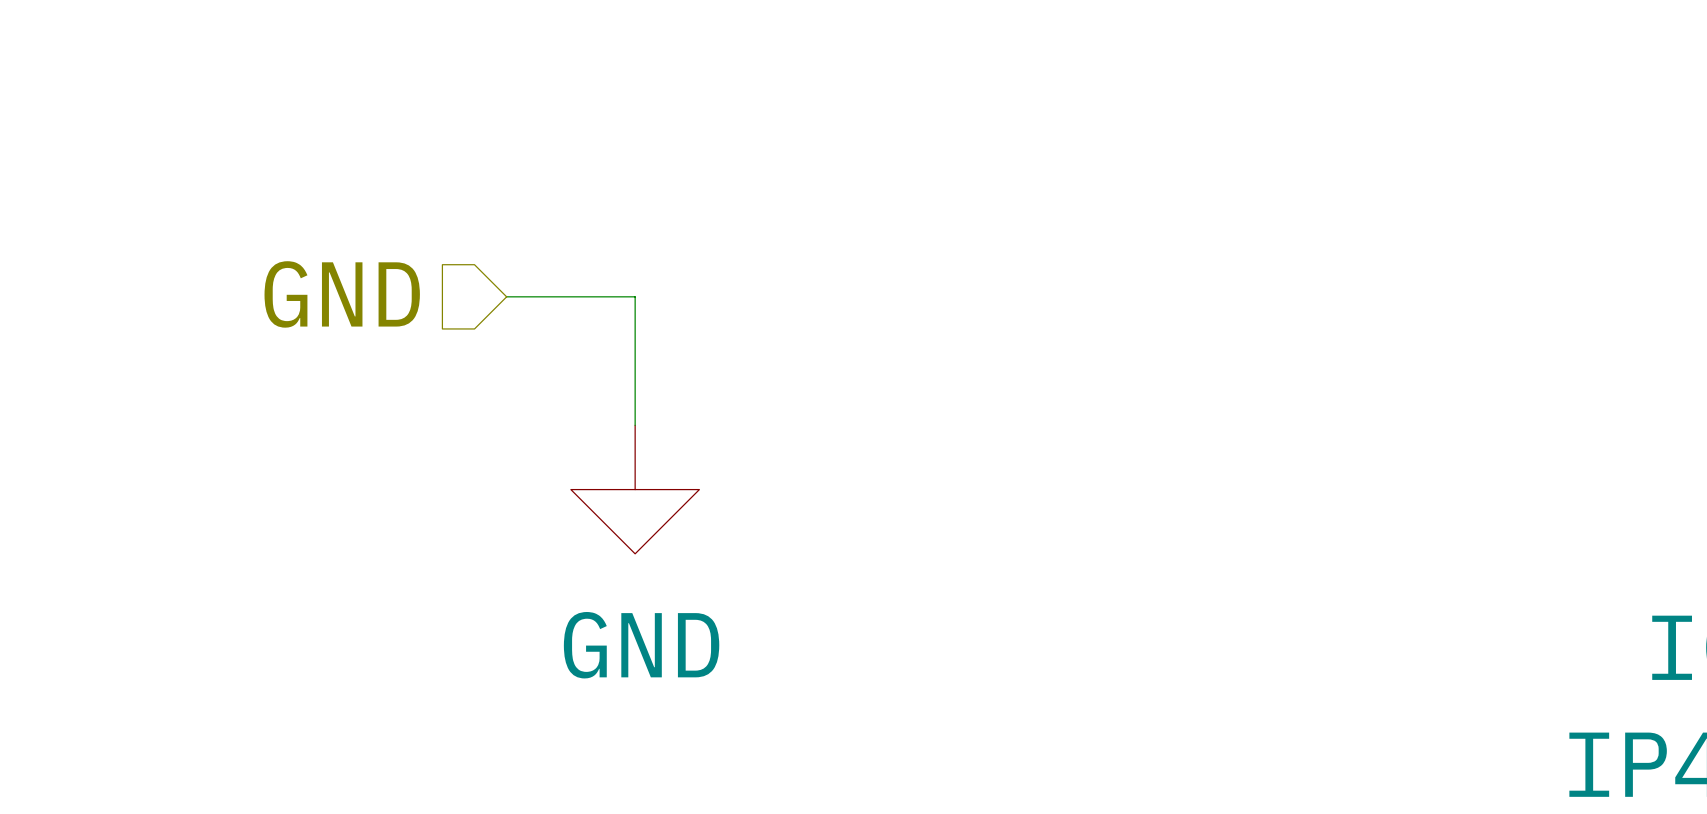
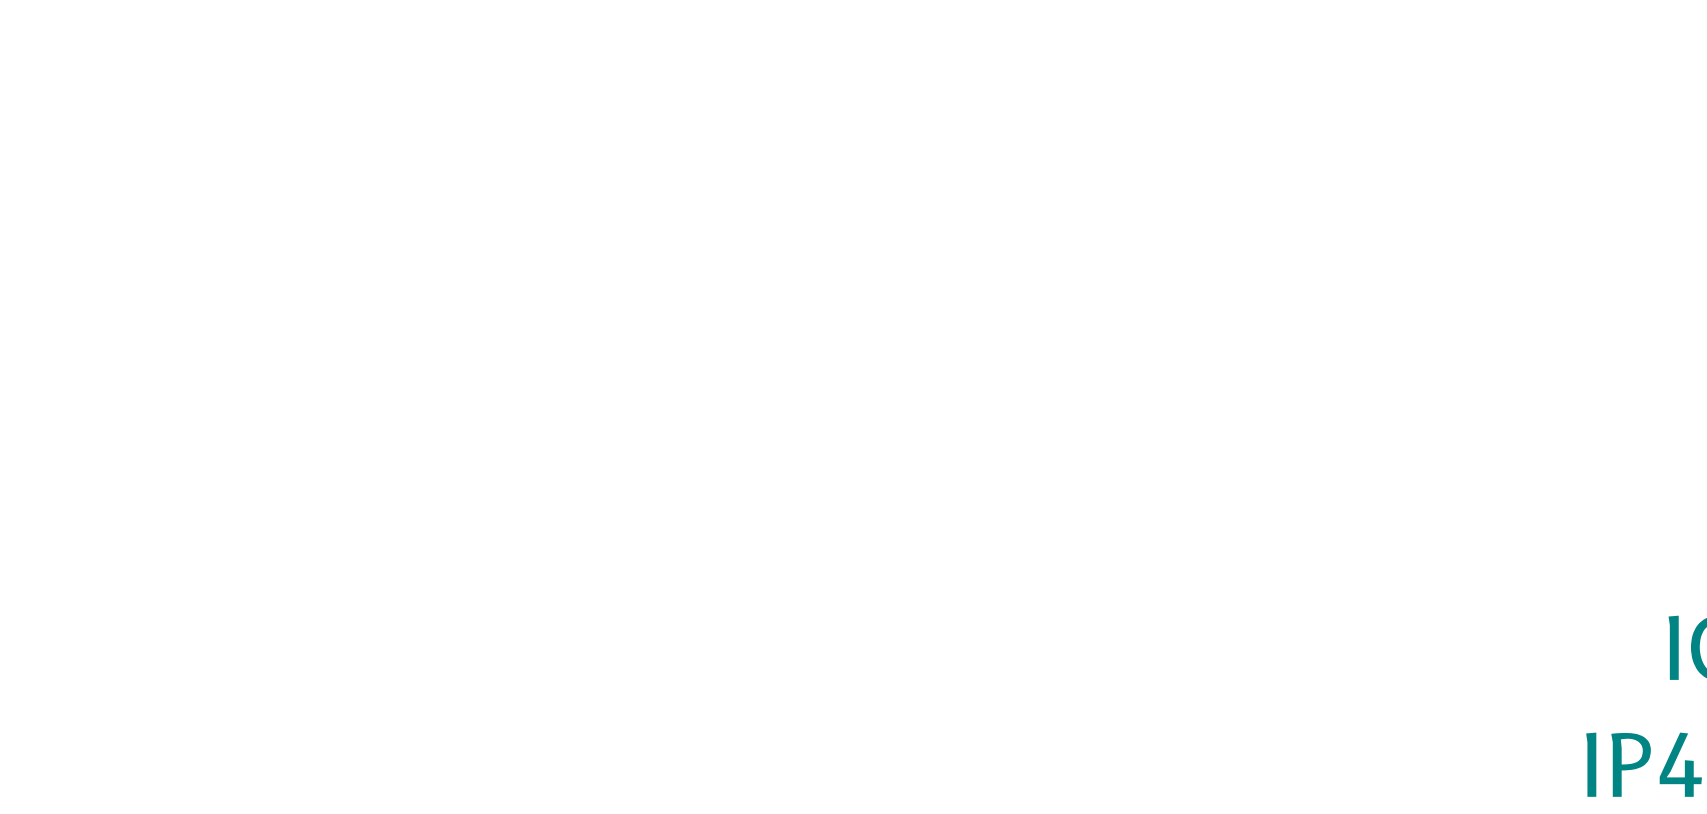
hierarchical label: GND (342, 294) -> none
wire: (506, 296) (635, 296) (635, 425) -> none
power symbol: GND (635, 489) -> none

